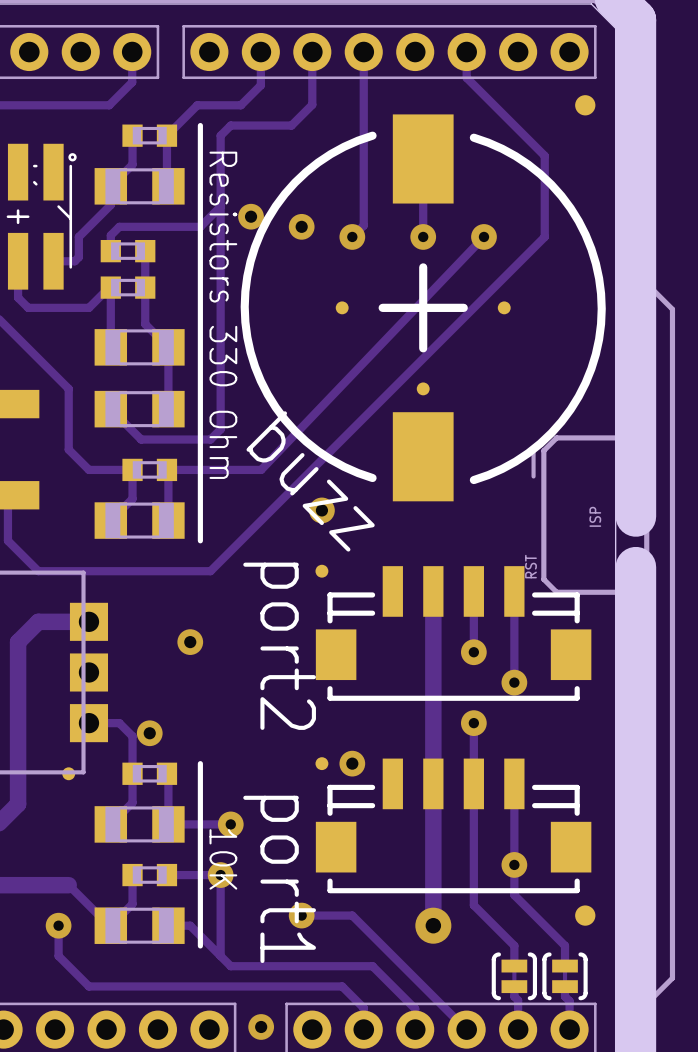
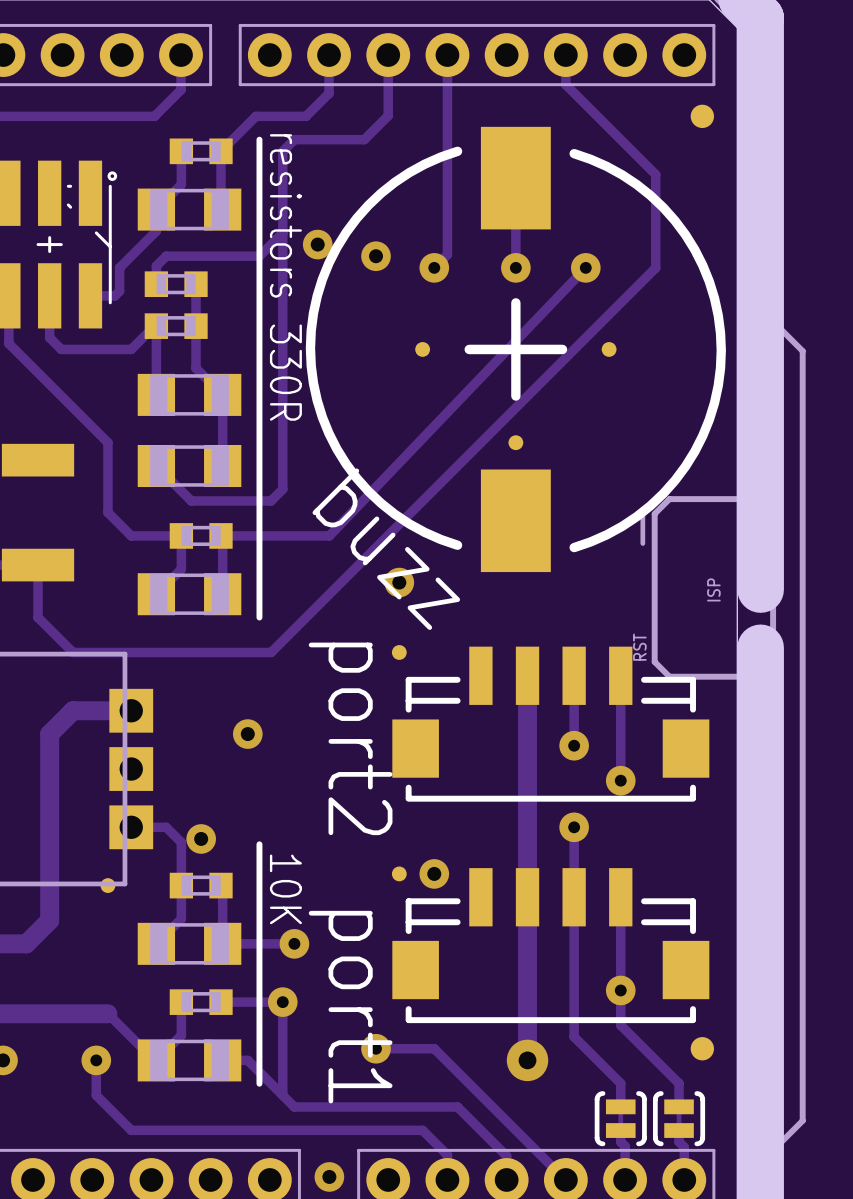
text: Resistors 330 Ohm (223, 315) -> resistors 330R (285, 277)
line: none -> (259, 844) (259, 873)
text position: 10K (223, 859) -> 10K (285, 889)

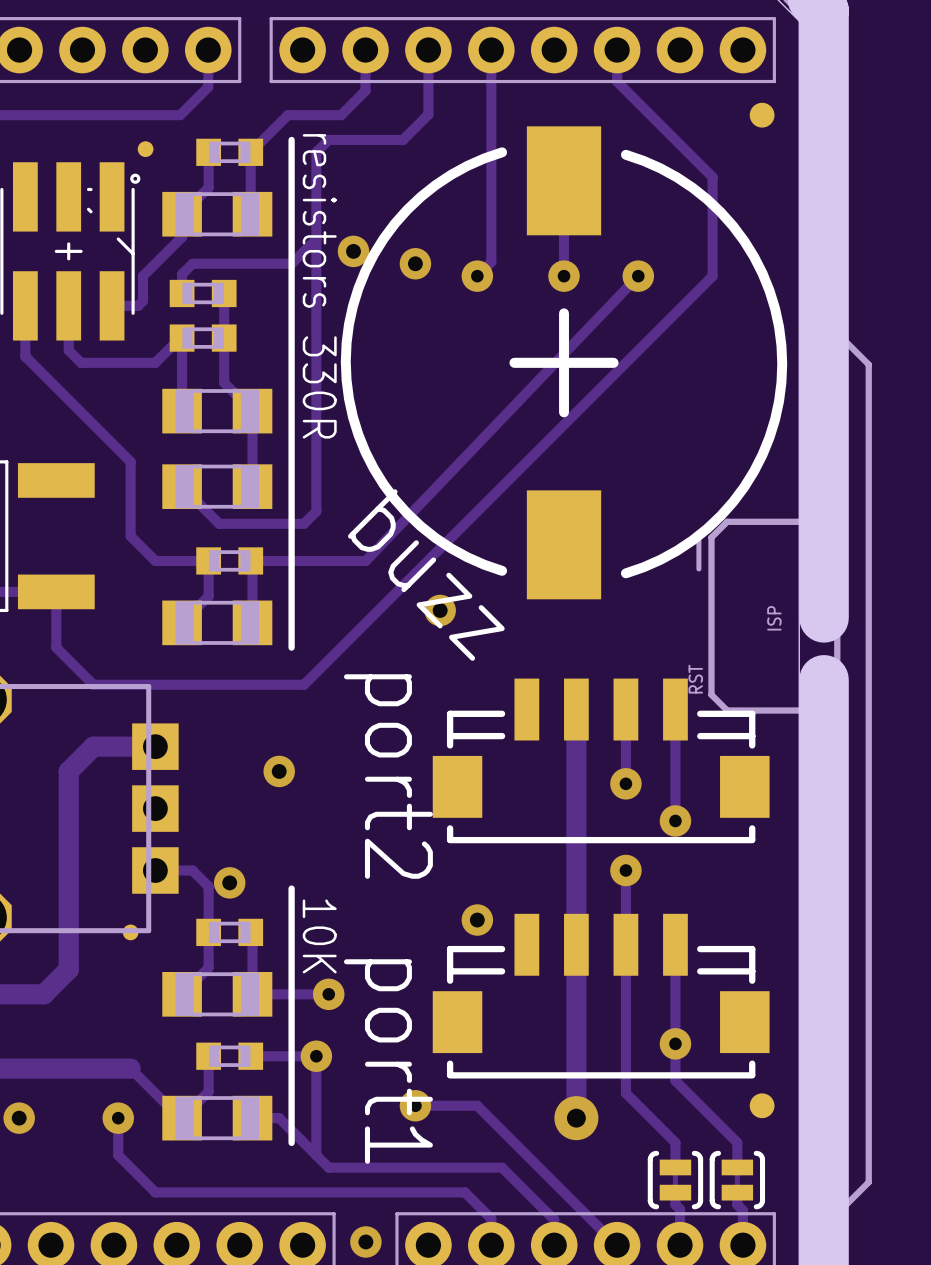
part: none -> (145, 149)
part: (422, 349) -> none
part: (609, 349) -> none
part: (515, 442) -> none
part: (399, 652) -> none
part: (399, 873) -> none

